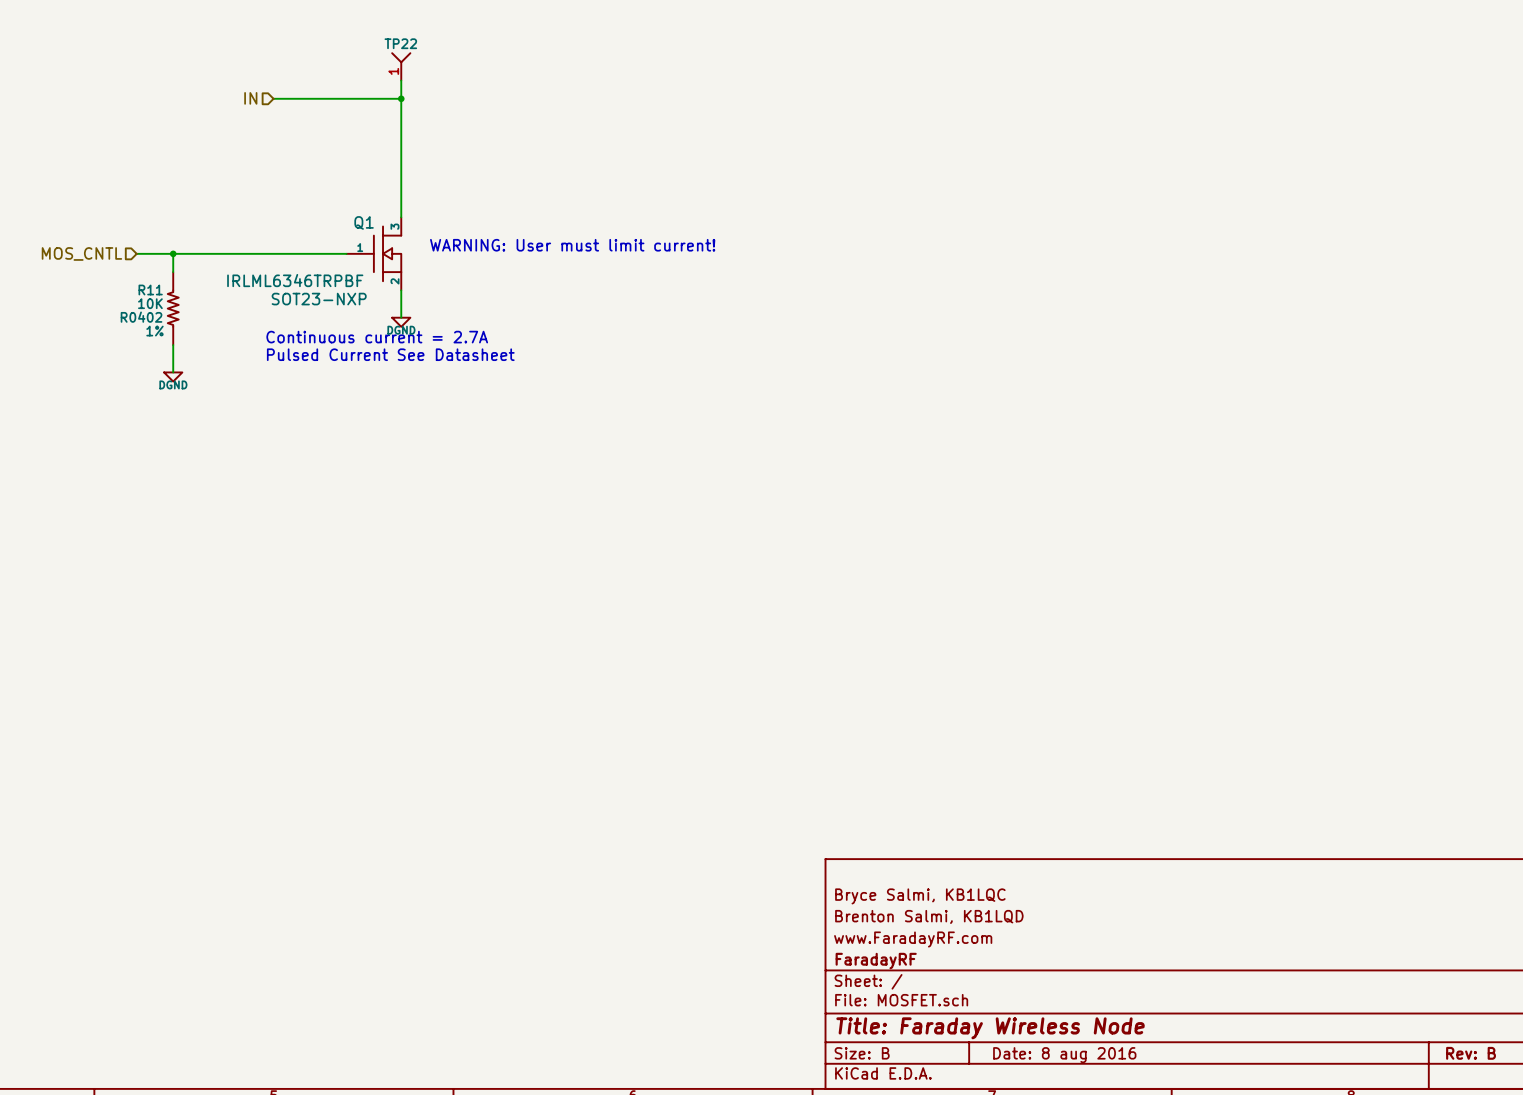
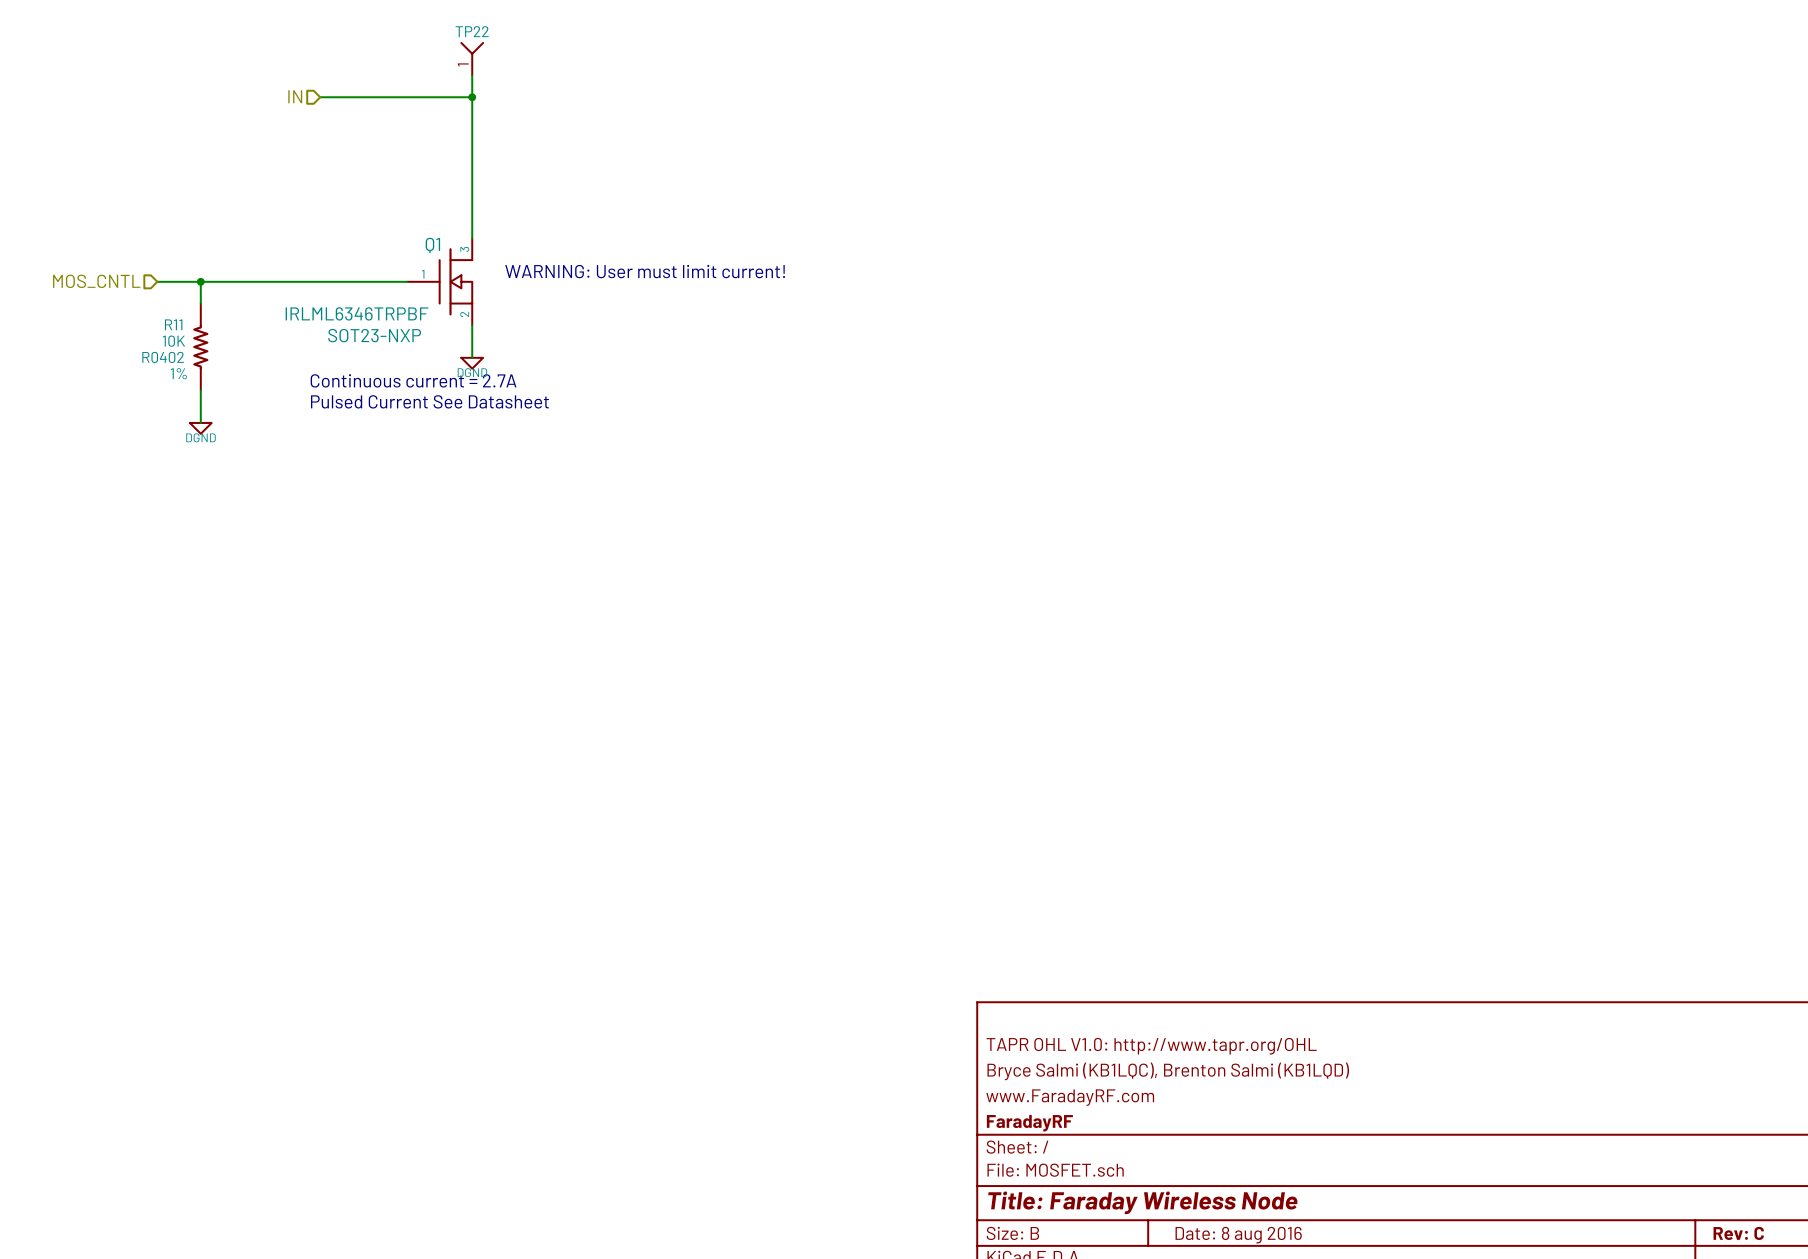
title block: Bryce Salmi, KB1LQC (920, 896) -> TAPR OHL V1.0: http://www.tapr.org/OHL (1151, 1046)
title block: Brenton Salmi, KB1LQD (929, 916) -> Bryce Salmi (KB1LQC), Brenton Salmi (KB1LQD) (1168, 1071)
title block: Rev: B (1471, 1053) -> Rev: C (1738, 1233)

